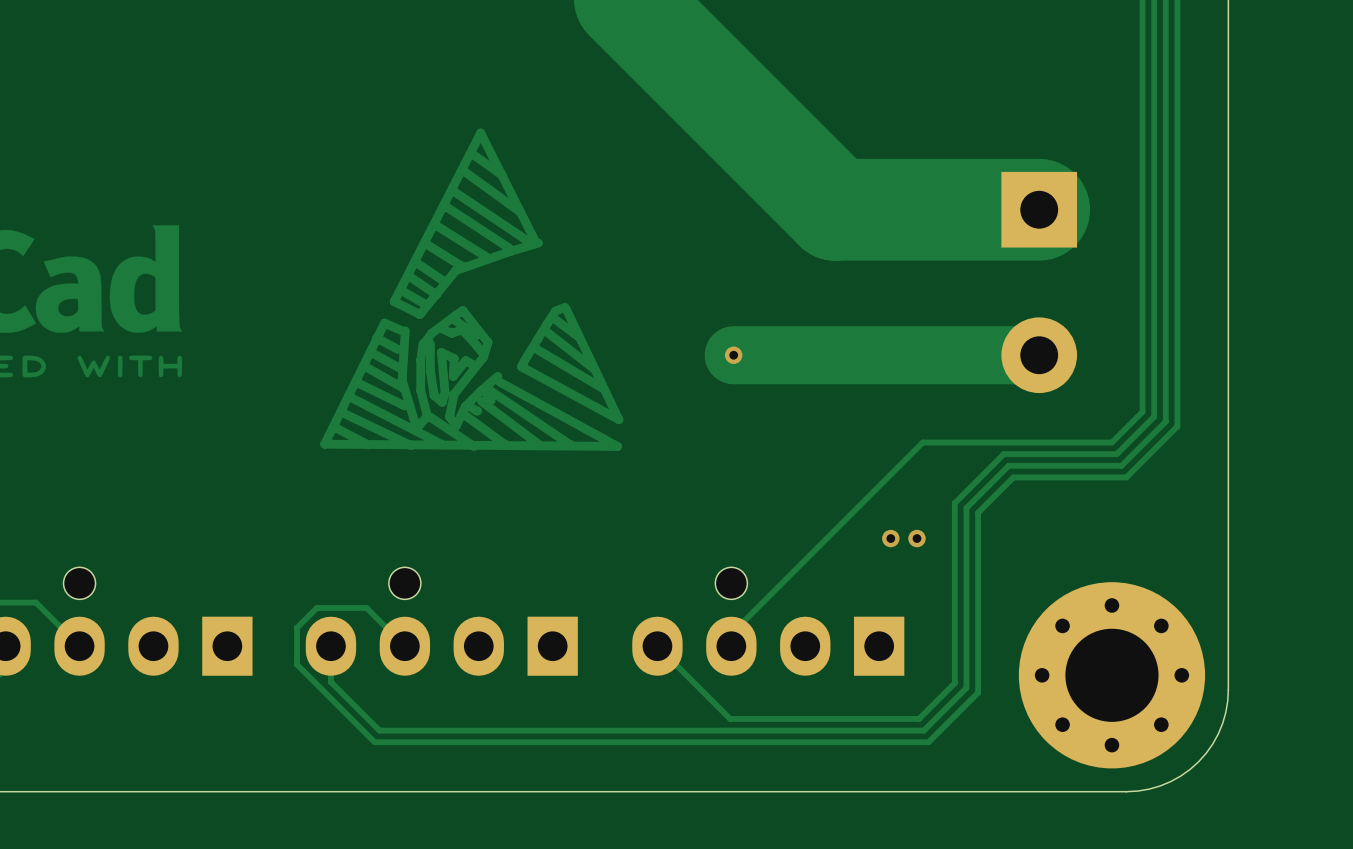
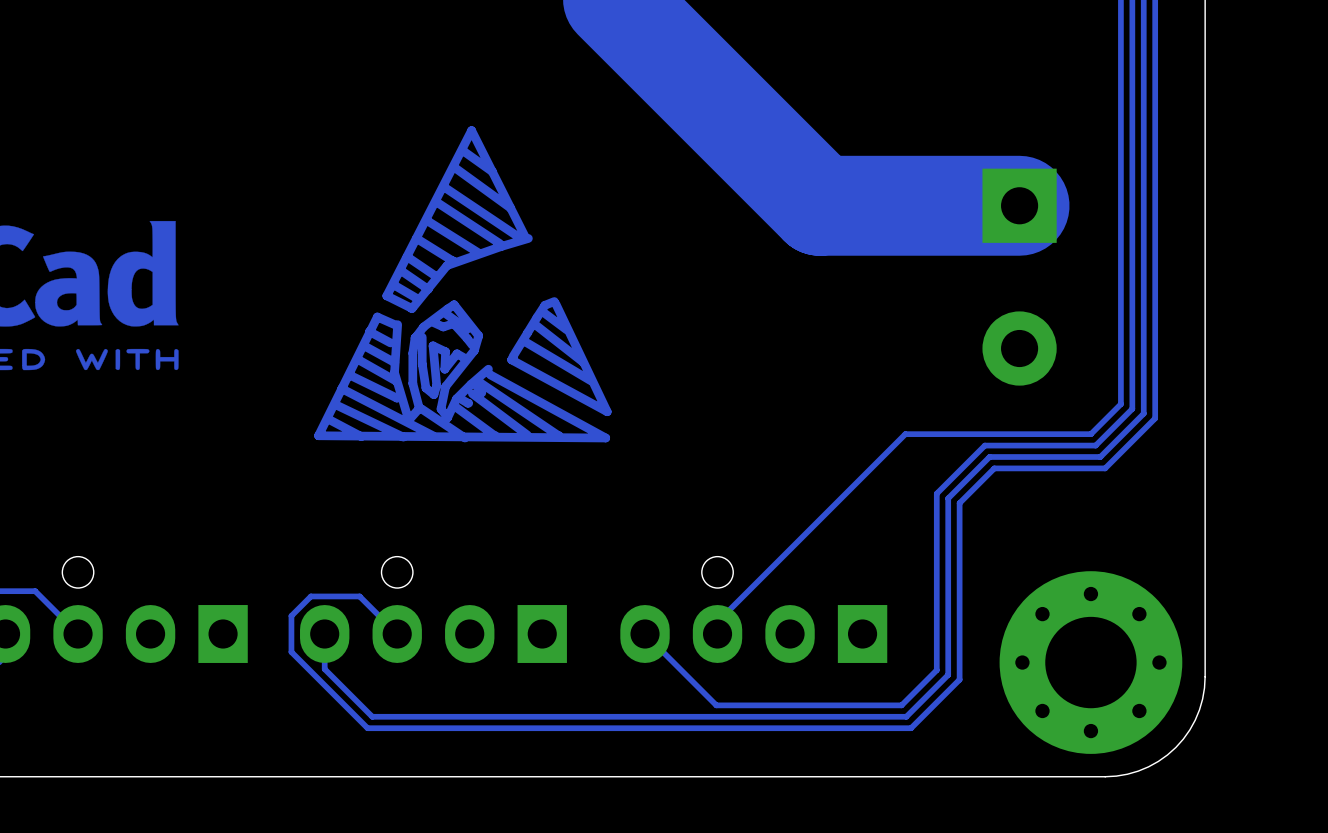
via: (733, 355) -> none
track: (1039, 355) (733, 355) -> none
via: (890, 538) -> none
via: (917, 538) -> none

